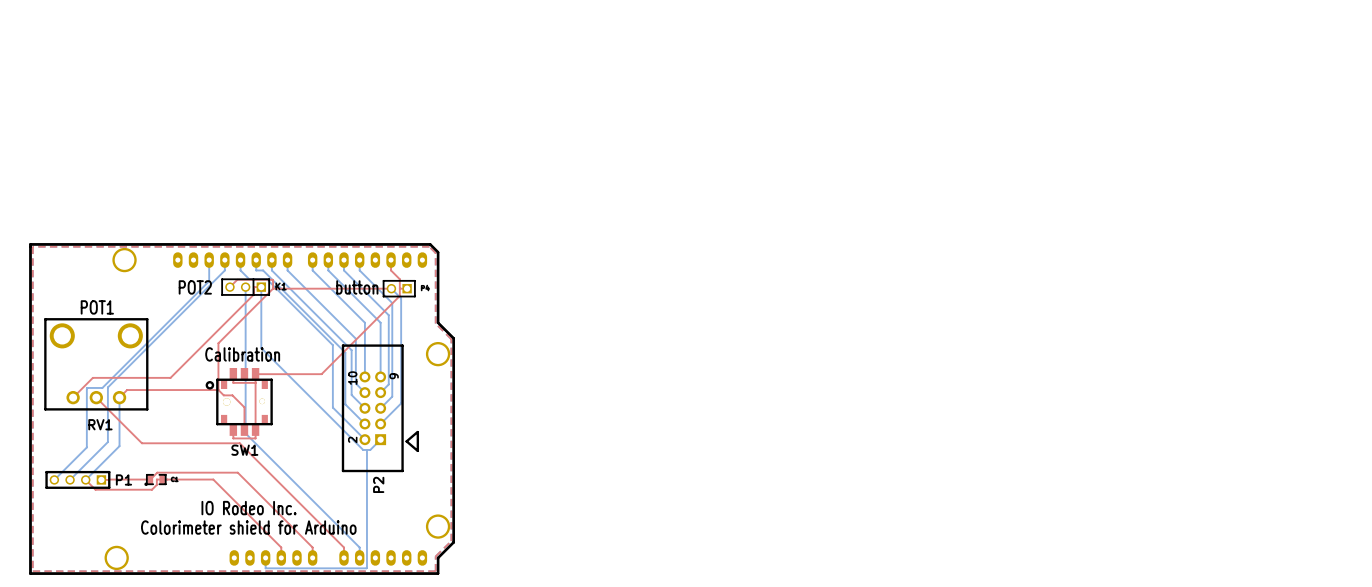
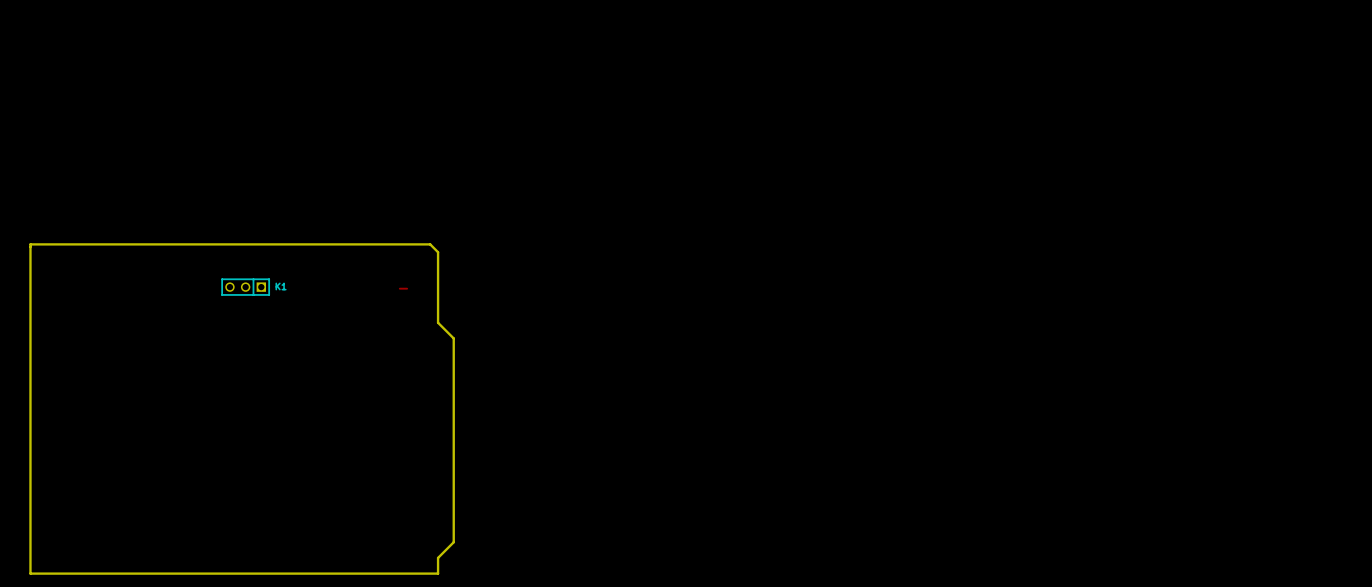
top zone outline: (32, 246) (429, 246) (435, 253) (435, 323) (451, 339) (451, 541) (435, 556) (435, 571) (32, 571) (32, 246) -> none
bottom track: (209, 260) (209, 281) (102, 387) (86, 388) (86, 447) (54, 479) -> none
bottom track: (224, 260) (224, 270) (107, 387) (107, 442) (70, 479) -> none
bottom track: (240, 260) (240, 270) (249, 279) (266, 279) (332, 345) (332, 407) (364, 439) -> none
bottom track: (256, 260) (256, 270) (263, 270) (345, 352) (345, 404) (364, 423) -> none
bottom track: (271, 260) (271, 270) (351, 350) (351, 394) (364, 408) -> none
bottom track: (287, 260) (287, 270) (355, 338) (355, 383) (364, 392) -> none
bottom track: (312, 260) (312, 270) (364, 322) (364, 376) -> none
bottom track: (328, 260) (328, 270) (380, 322) (380, 376) -> none
bottom track: (344, 260) (344, 270) (388, 315) (388, 384) (380, 392) -> none
bottom track: (359, 260) (359, 270) (392, 303) (392, 396) (380, 408) -> none
top track: (391, 260) (391, 270) (399, 279) (399, 295) (321, 374) (255, 374) (255, 438) (233, 438) (233, 429) -> none
text: POT2 (195, 287) -> none
top track: (229, 287) (237, 279) (272, 279) (273, 288) -> none
bottom track: (245, 287) (245, 433) (359, 547) (359, 557) -> none
top track: (261, 287) (254, 287) (254, 294) (170, 377) (92, 377) (73, 397) -> none
bottom track: (261, 287) (261, 348) (363, 449) (370, 449) (380, 439) -> none
text: button (357, 287) -> none
top track: (273, 288) (391, 288) -> none
top track: (273, 288) (218, 343) (218, 390) -> none
bottom track: (391, 288) (401, 298) (401, 403) (380, 423) -> none
part: (399, 288) -> none
text: POT1 (97, 307) -> none
text: Calibration (242, 354) -> none
RV1: (96, 364) -> none
top track: (233, 374) (233, 382) (255, 382) -> none
top track: (218, 390) (127, 390) (119, 397) -> none
top track: (218, 390) (223, 395) (232, 395) (244, 407) (244, 429) -> none
top track: (96, 397) (141, 443) (239, 443) (344, 547) (344, 557) -> none
bottom track: (119, 397) (119, 446) (85, 479) -> none
SW1: (239, 401) -> none
P2: (380, 408) -> none
part: (242, 409) -> none
bottom track: (366, 449) (366, 567) (265, 568) (265, 557) -> none
P1: (77, 479) -> none
top track: (85, 479) (95, 489) (151, 489) (156, 484) (156, 479) (213, 479) (281, 547) (281, 557) -> none
top track: (101, 479) (150, 479) (157, 472) (237, 472) (312, 547) (312, 557) -> none
part: (155, 479) -> none
text: IO Rodeo Inc. (248, 508) -> none
text: Colorimeter shield for Arduino (248, 527) -> none

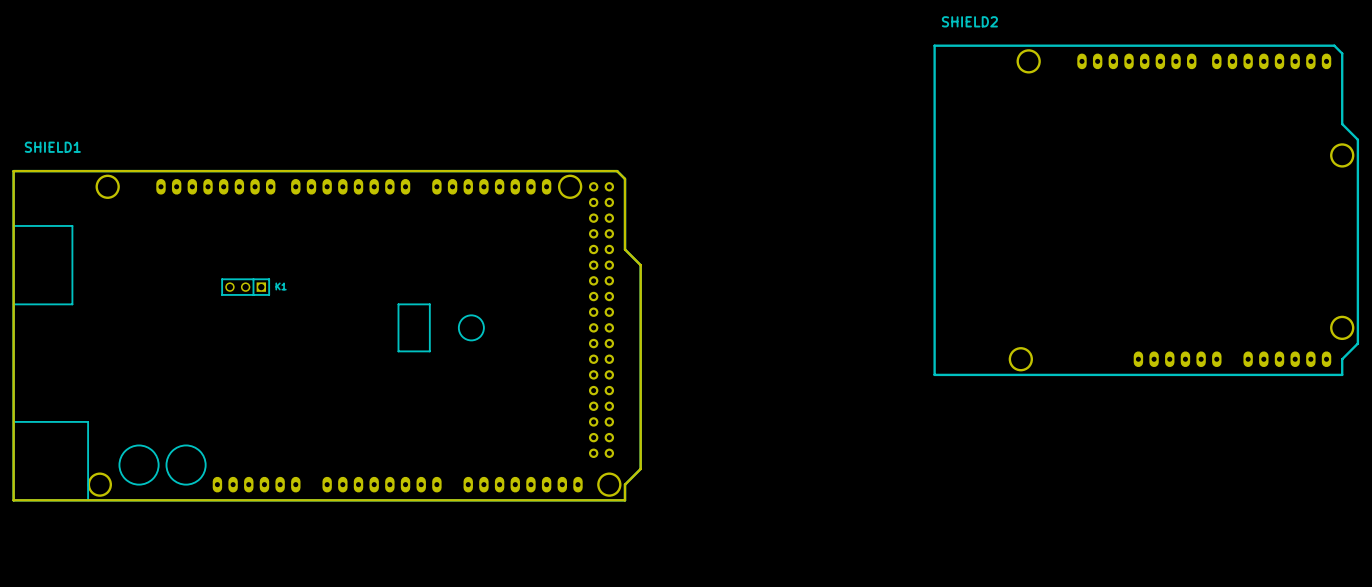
board edge: none -> (13, 171) (617, 171) (625, 178) (625, 249) (640, 265) (640, 468) (625, 484) (625, 500) (13, 500) (13, 171)
SHIELD2: none -> (1146, 210)
board edge: (30, 246) (30, 244) (430, 244) (438, 252) (438, 322) (453, 338) (453, 542) (438, 557) (438, 573) (30, 573) (30, 247) -> none
top track: (399, 288) (407, 288) -> none
SHIELD1: none -> (327, 335)

